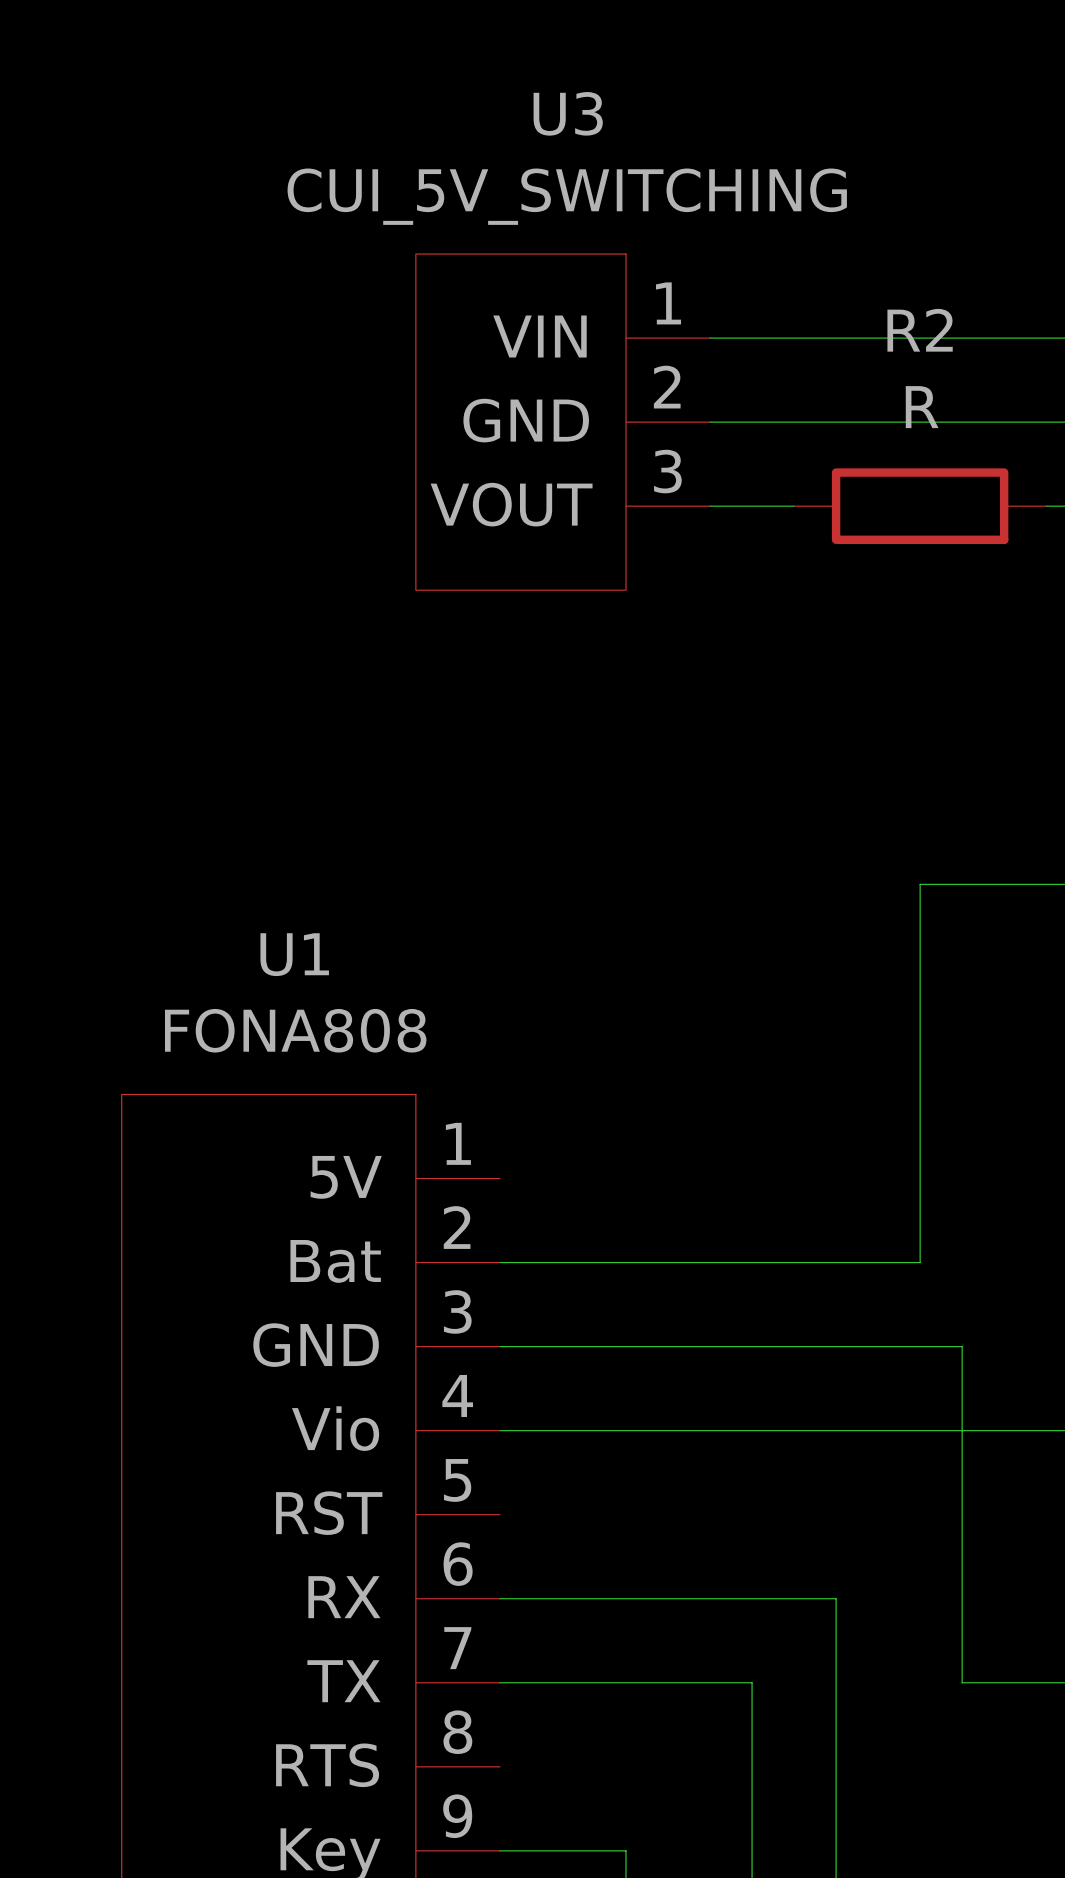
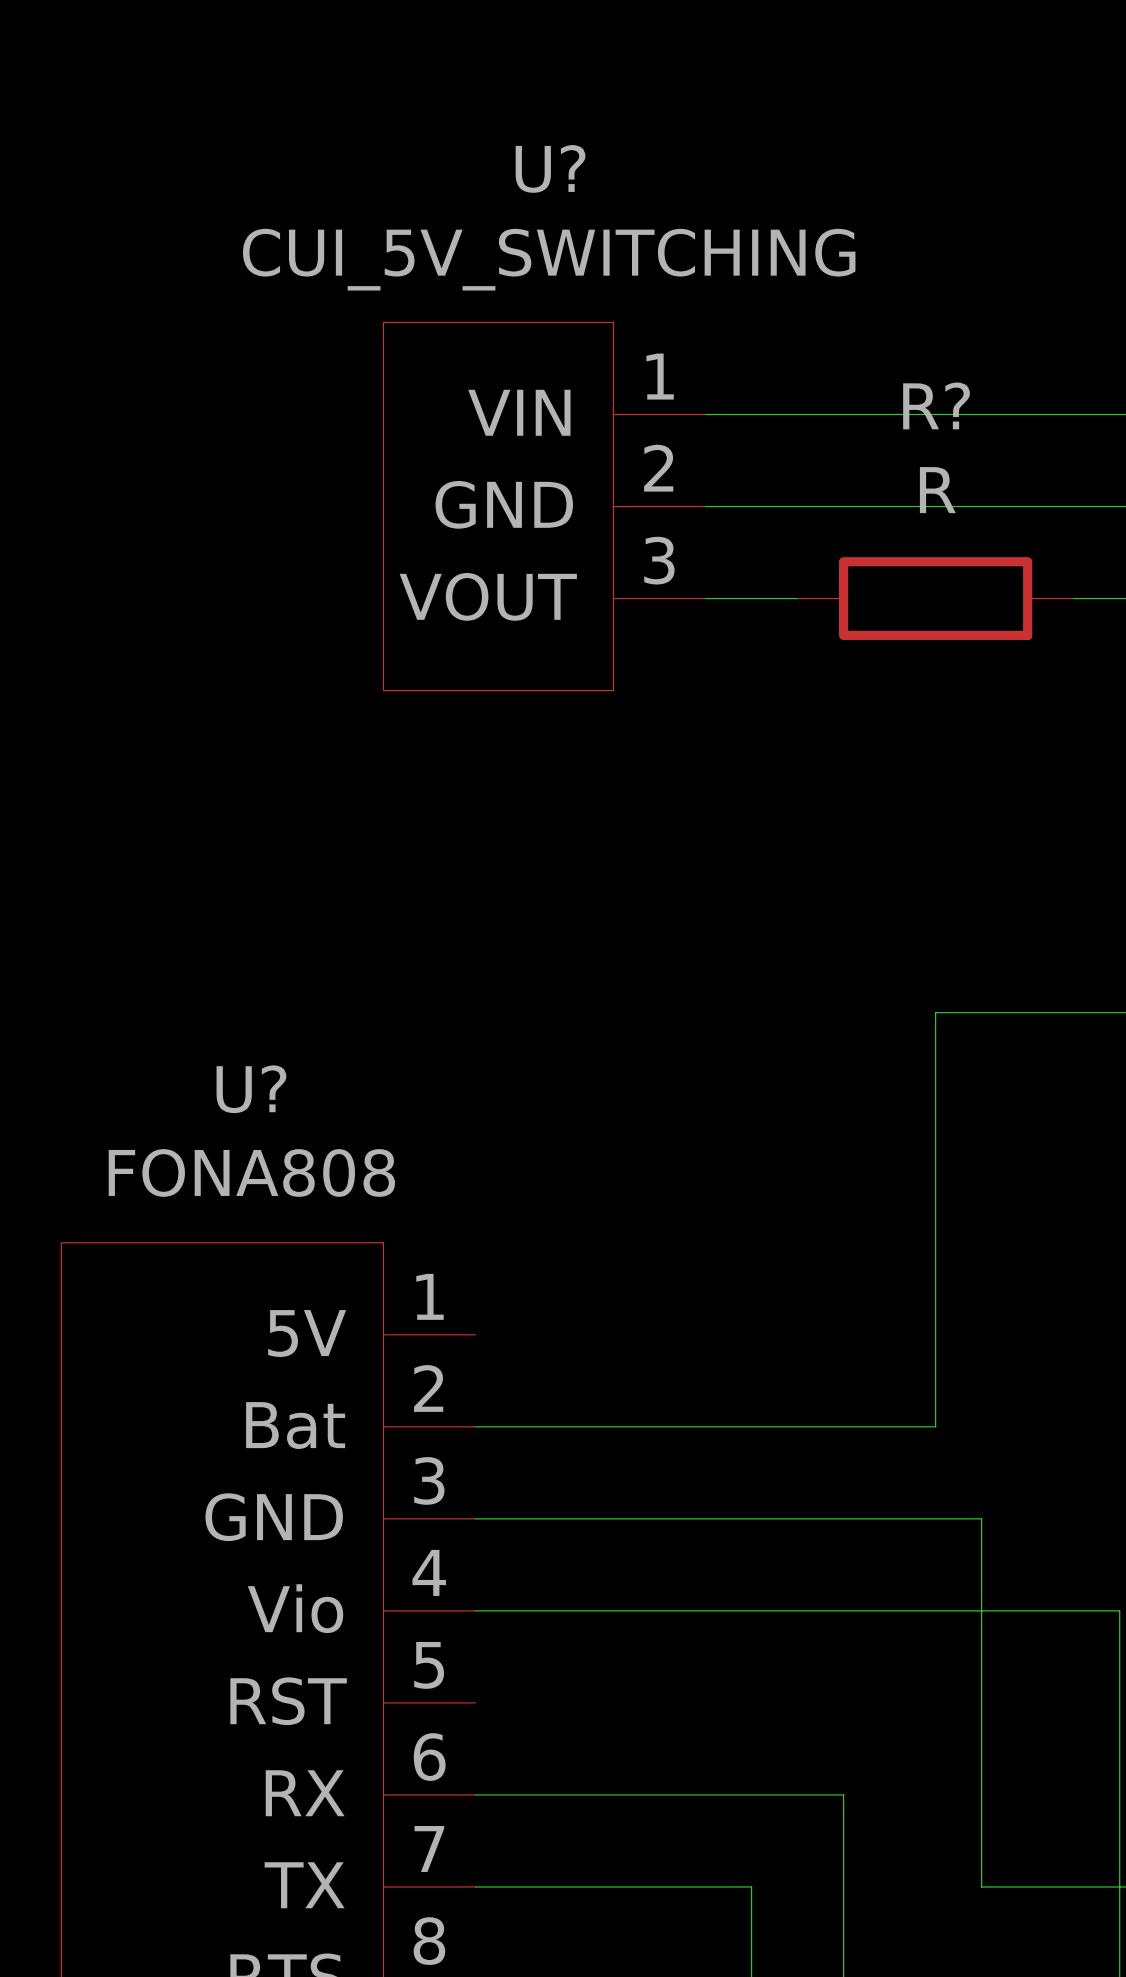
U3 name: U3 (568, 113) -> U? (550, 168)
R2 name: R2 (920, 330) -> R? (936, 405)
U1 name: U1 (294, 954) -> U? (251, 1089)

